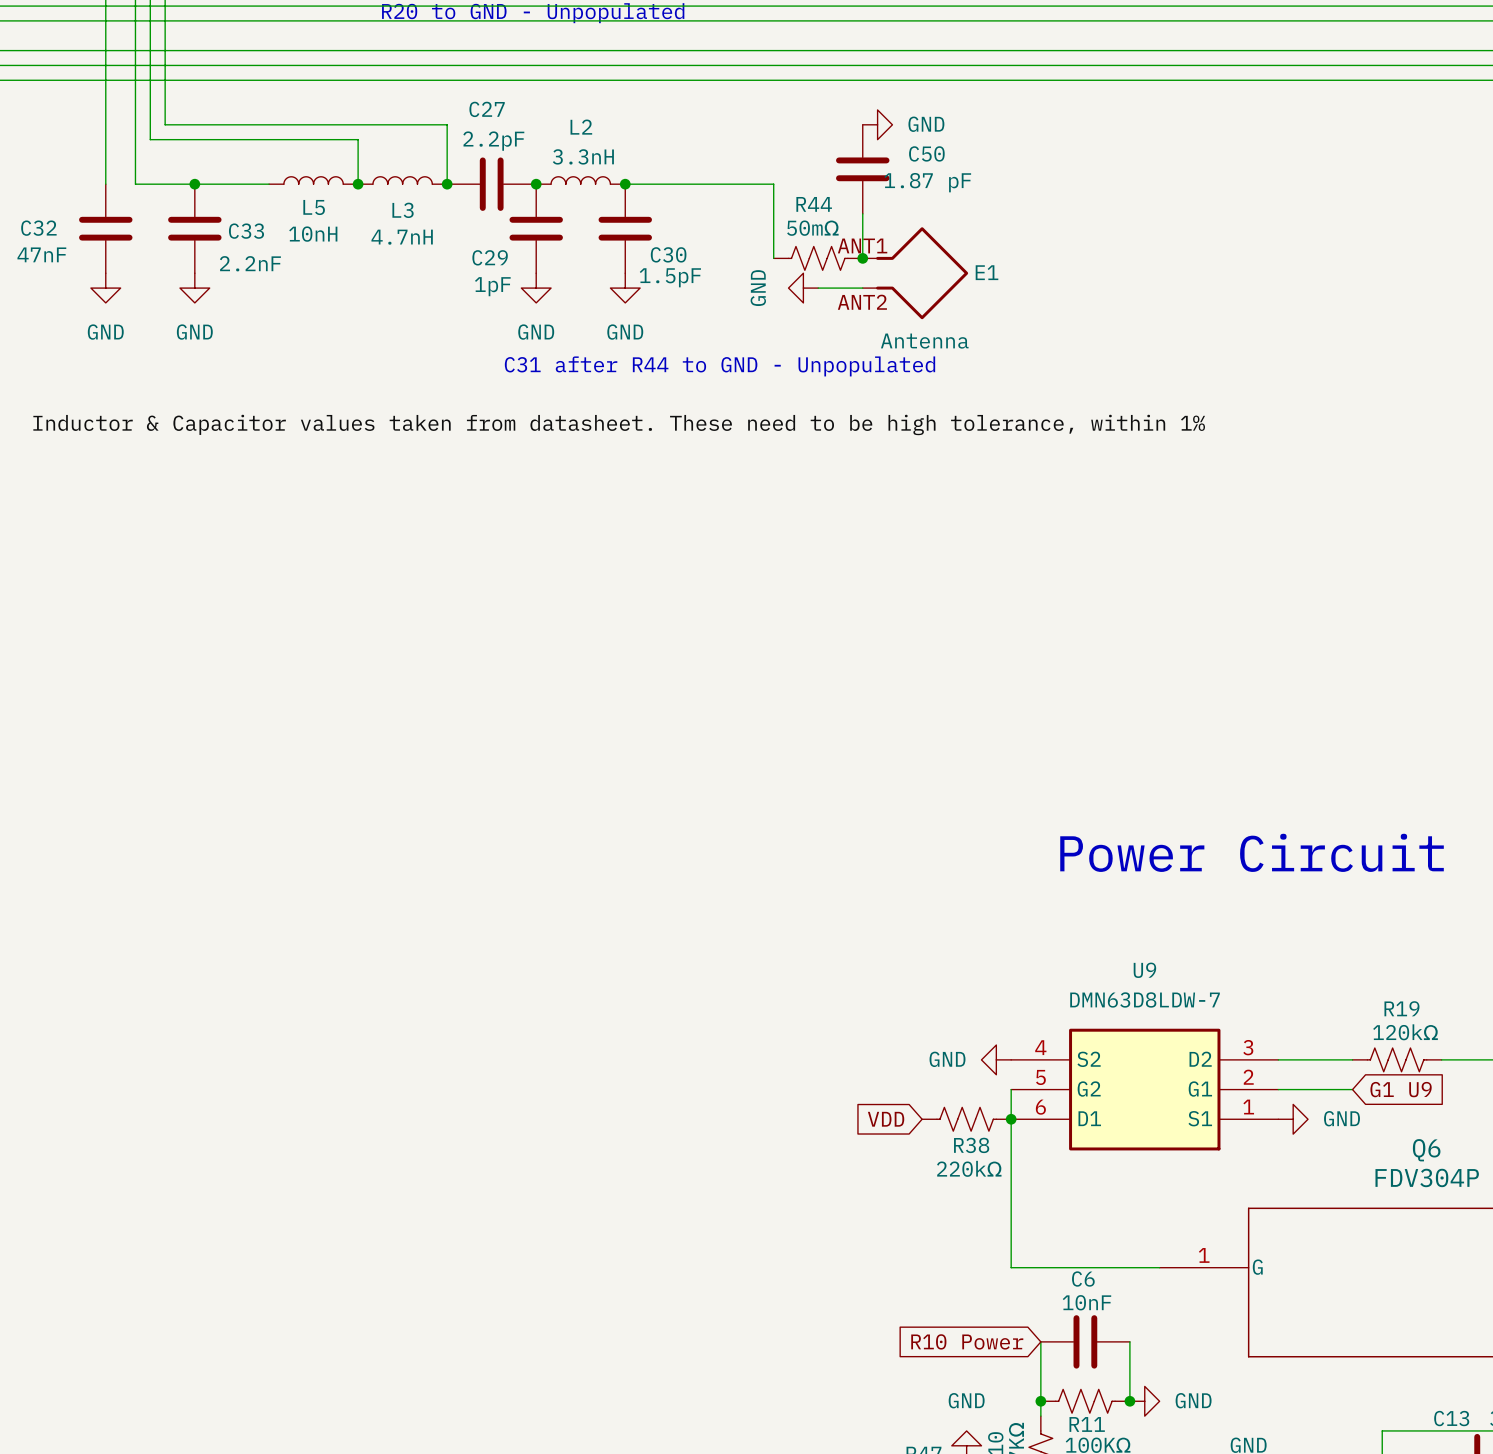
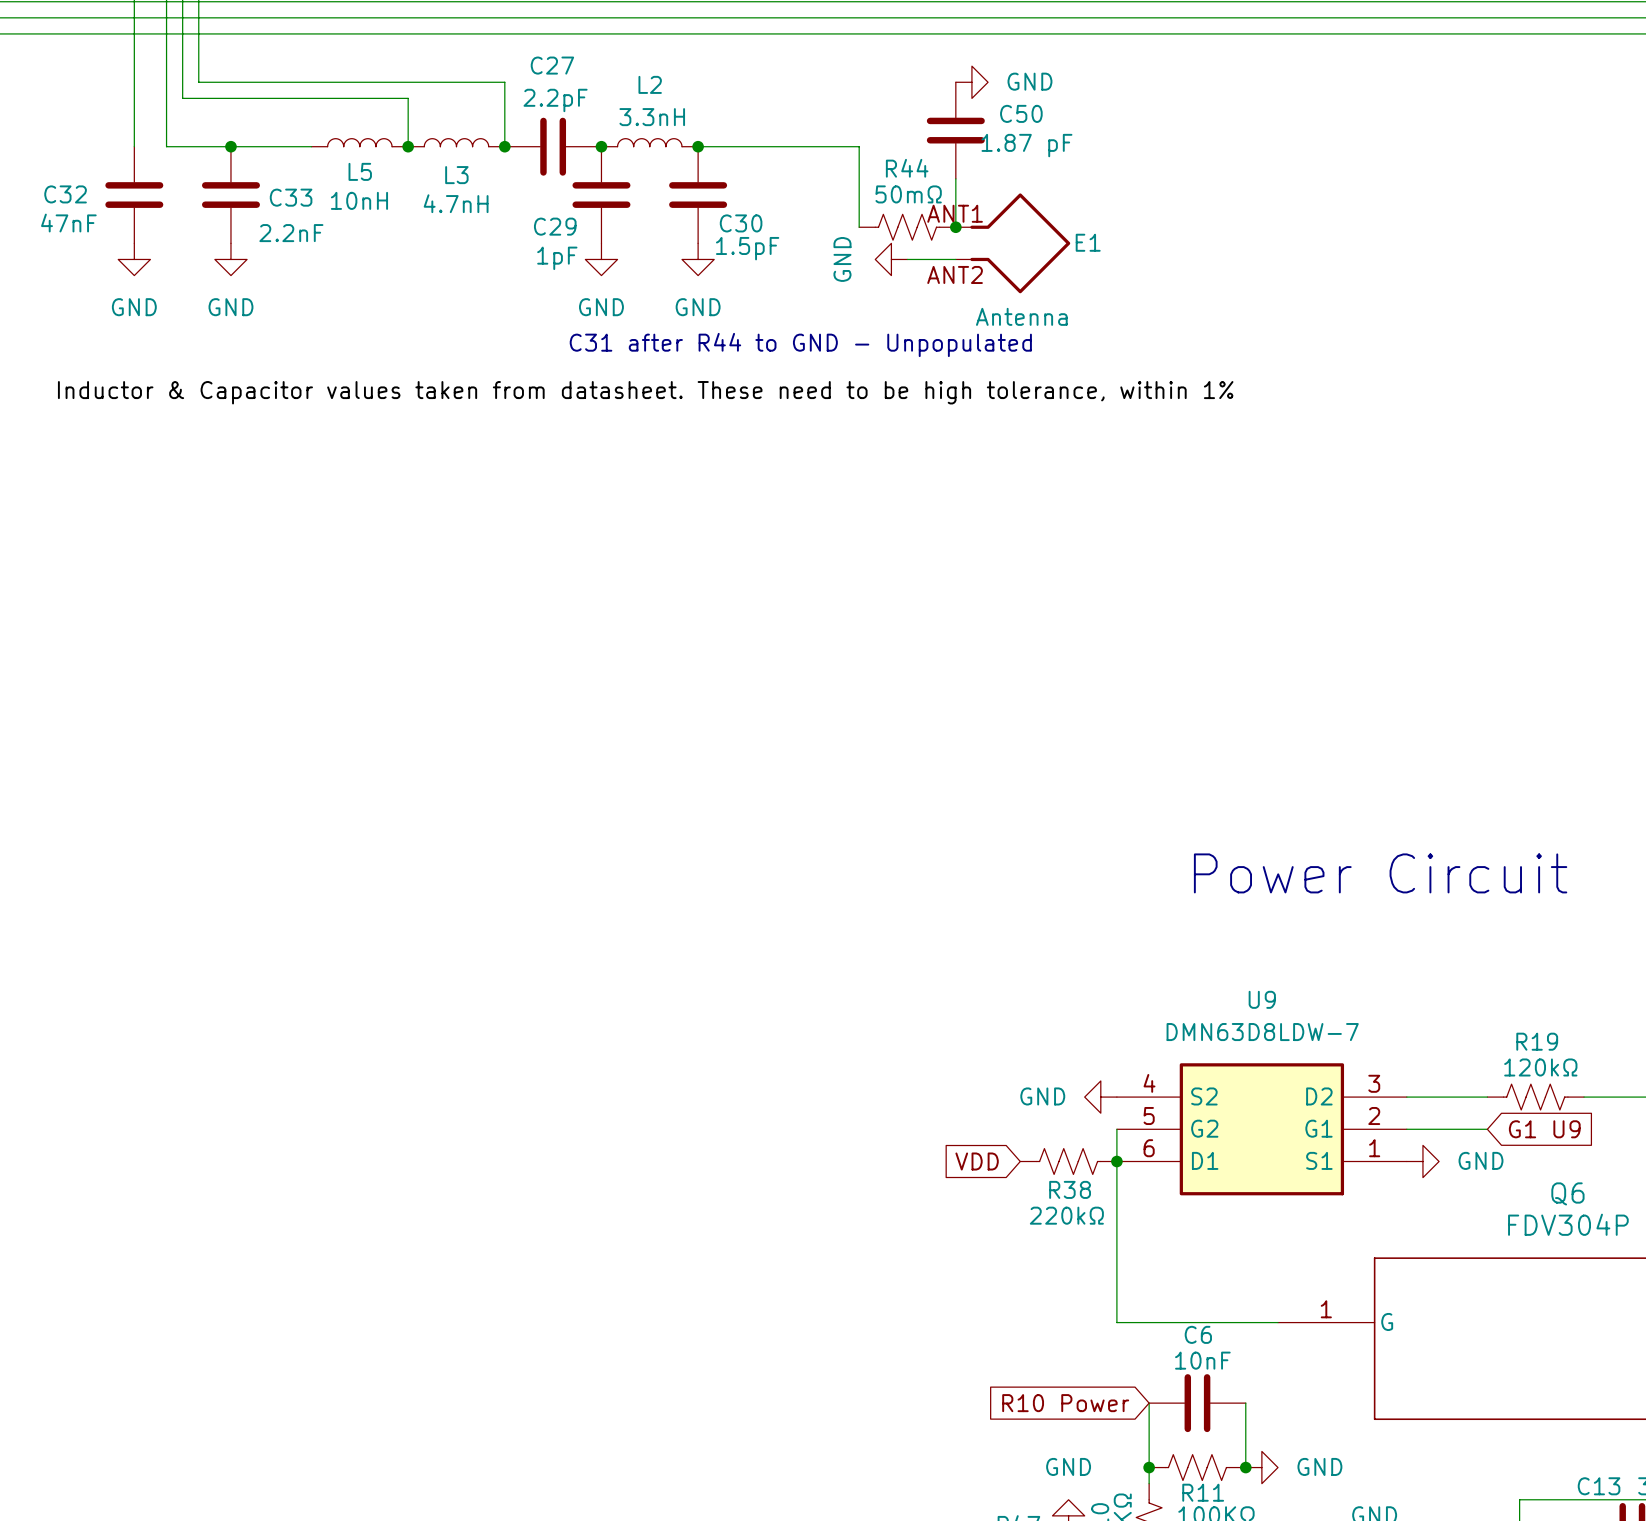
label position: Inductor & Capacitor values taken from datasheet. These need to be high tolerance, within 1% (619, 424) -> Inductor & Capacitor values taken from datasheet. These need to be high tolerance, within 1% (645, 392)

